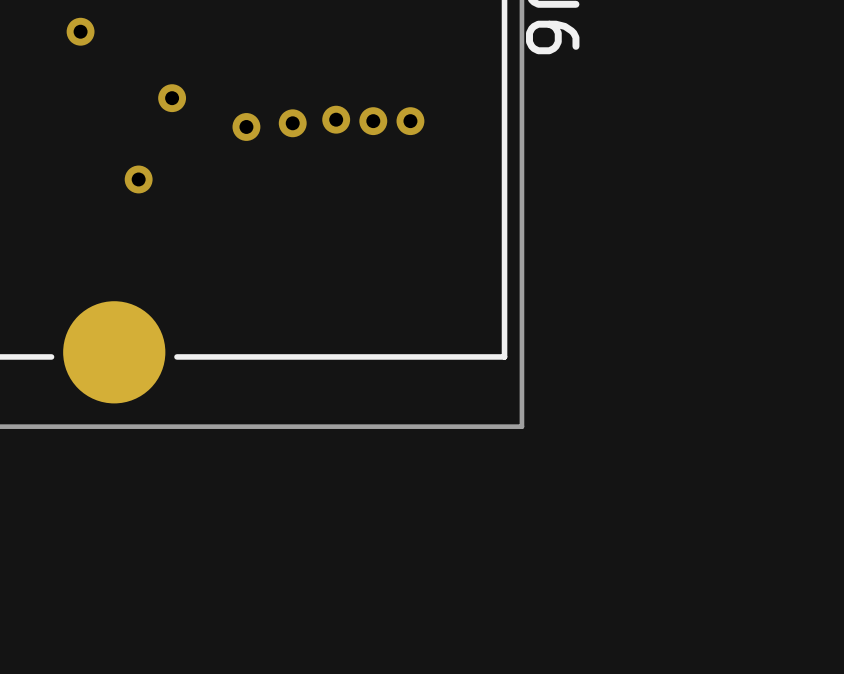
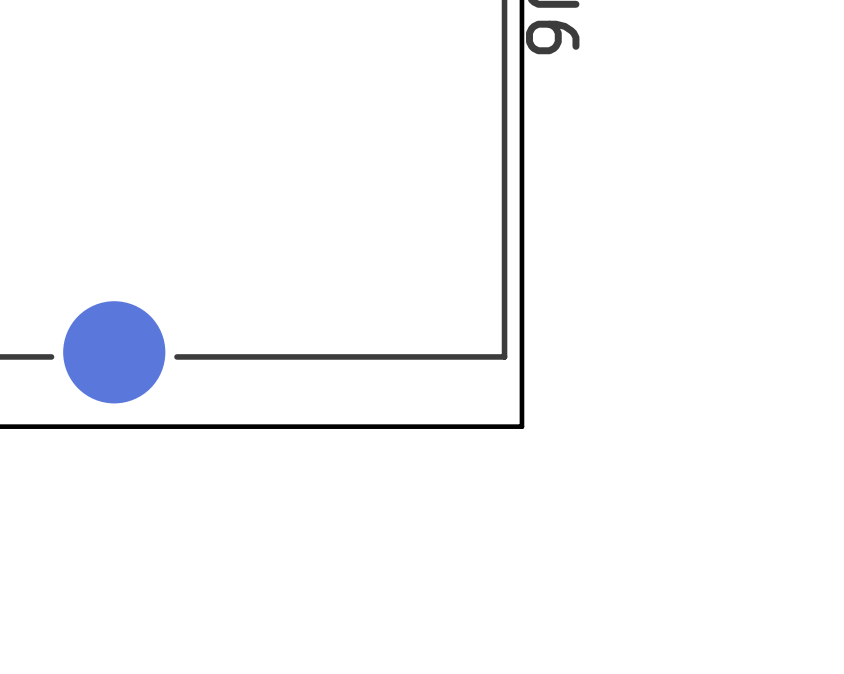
via: (80, 31) -> none
via: (172, 98) -> none
via: (336, 119) -> none
via: (373, 121) -> none
via: (410, 121) -> none
via: (292, 123) -> none
via: (246, 126) -> none
via: (138, 179) -> none

